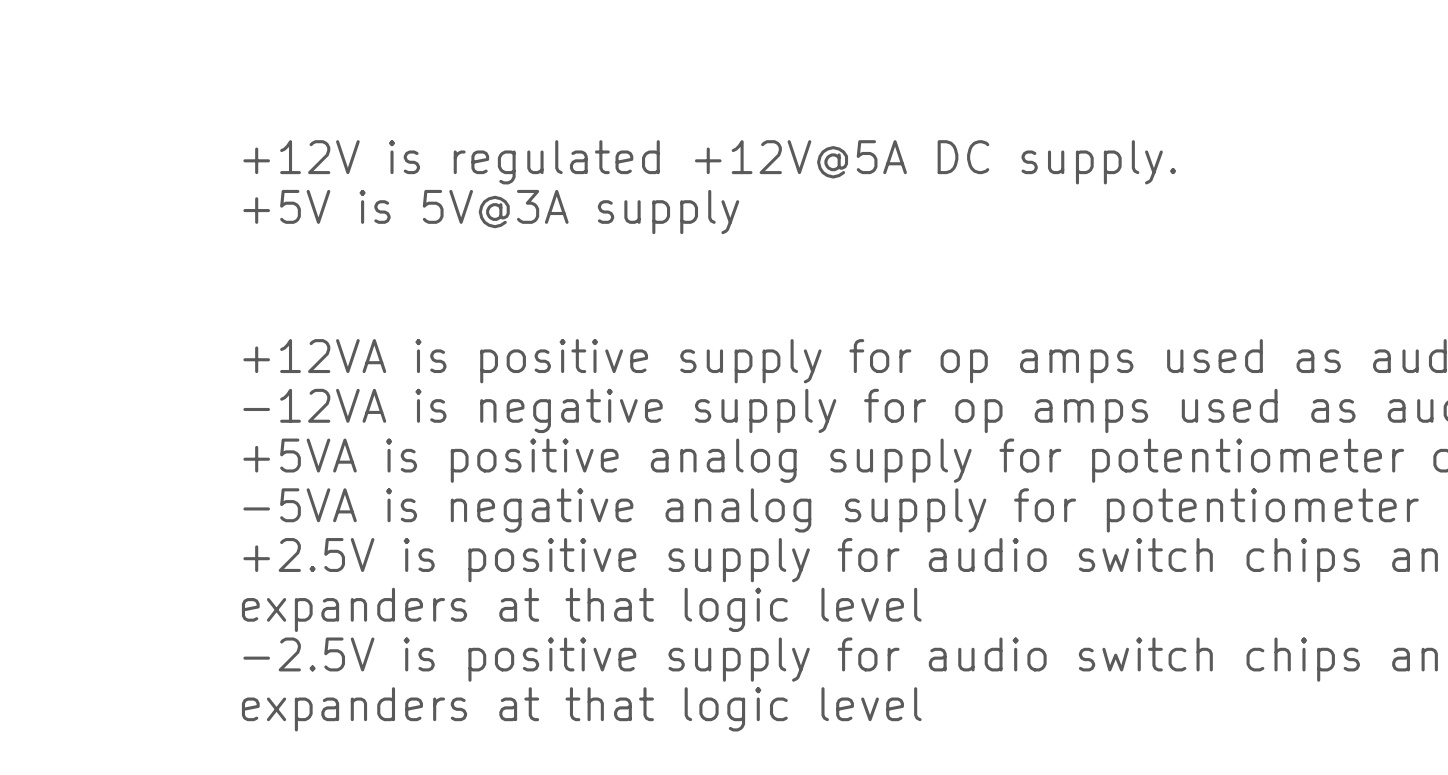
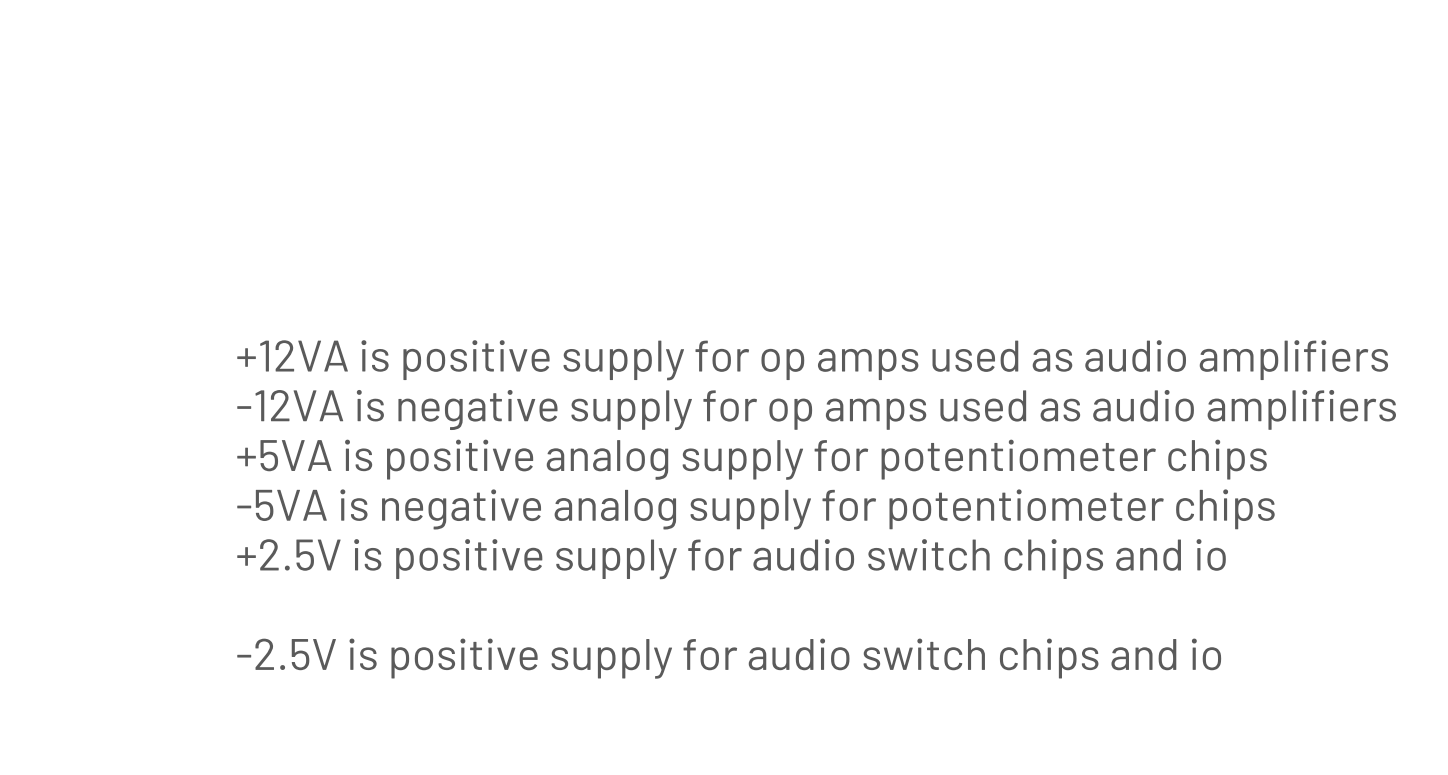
text: +12V is regulated +12V@5A DC supply. (709, 162) -> none
text: +5V is 5V@3A supply (491, 212) -> none
text: expanders at that logic level (581, 609) -> none
text: expanders at that logic level (581, 709) -> none

